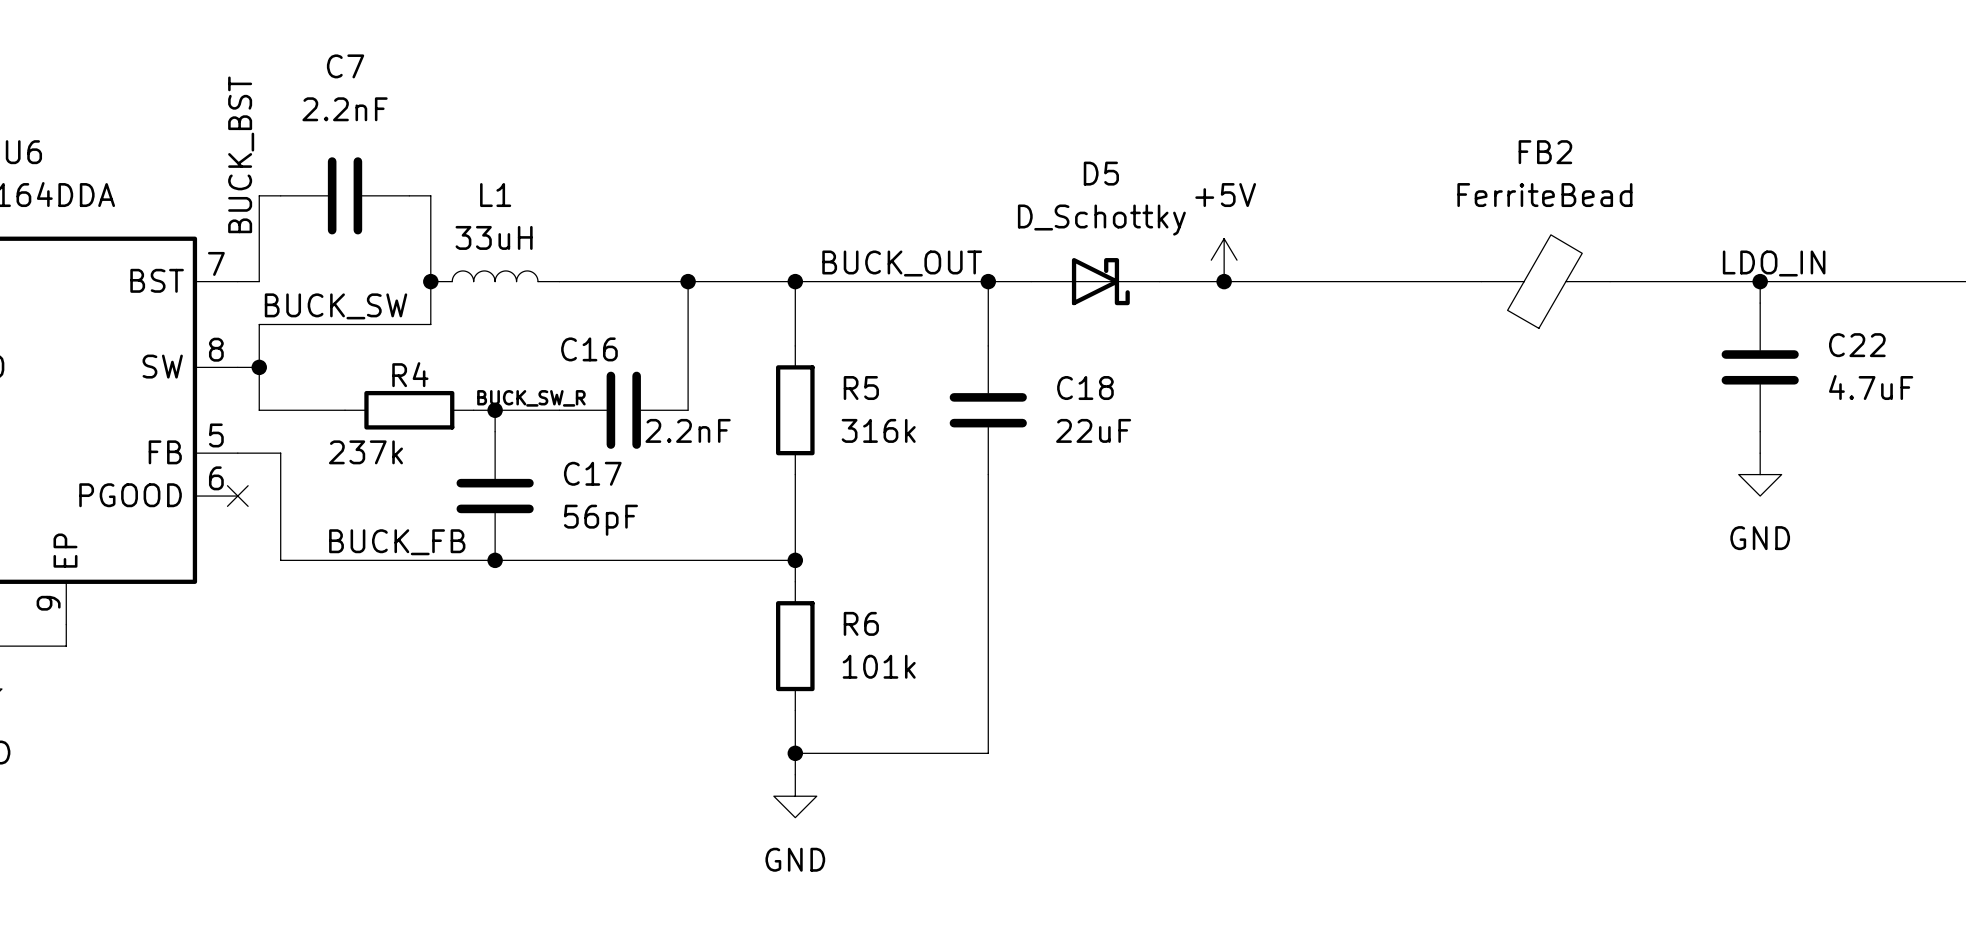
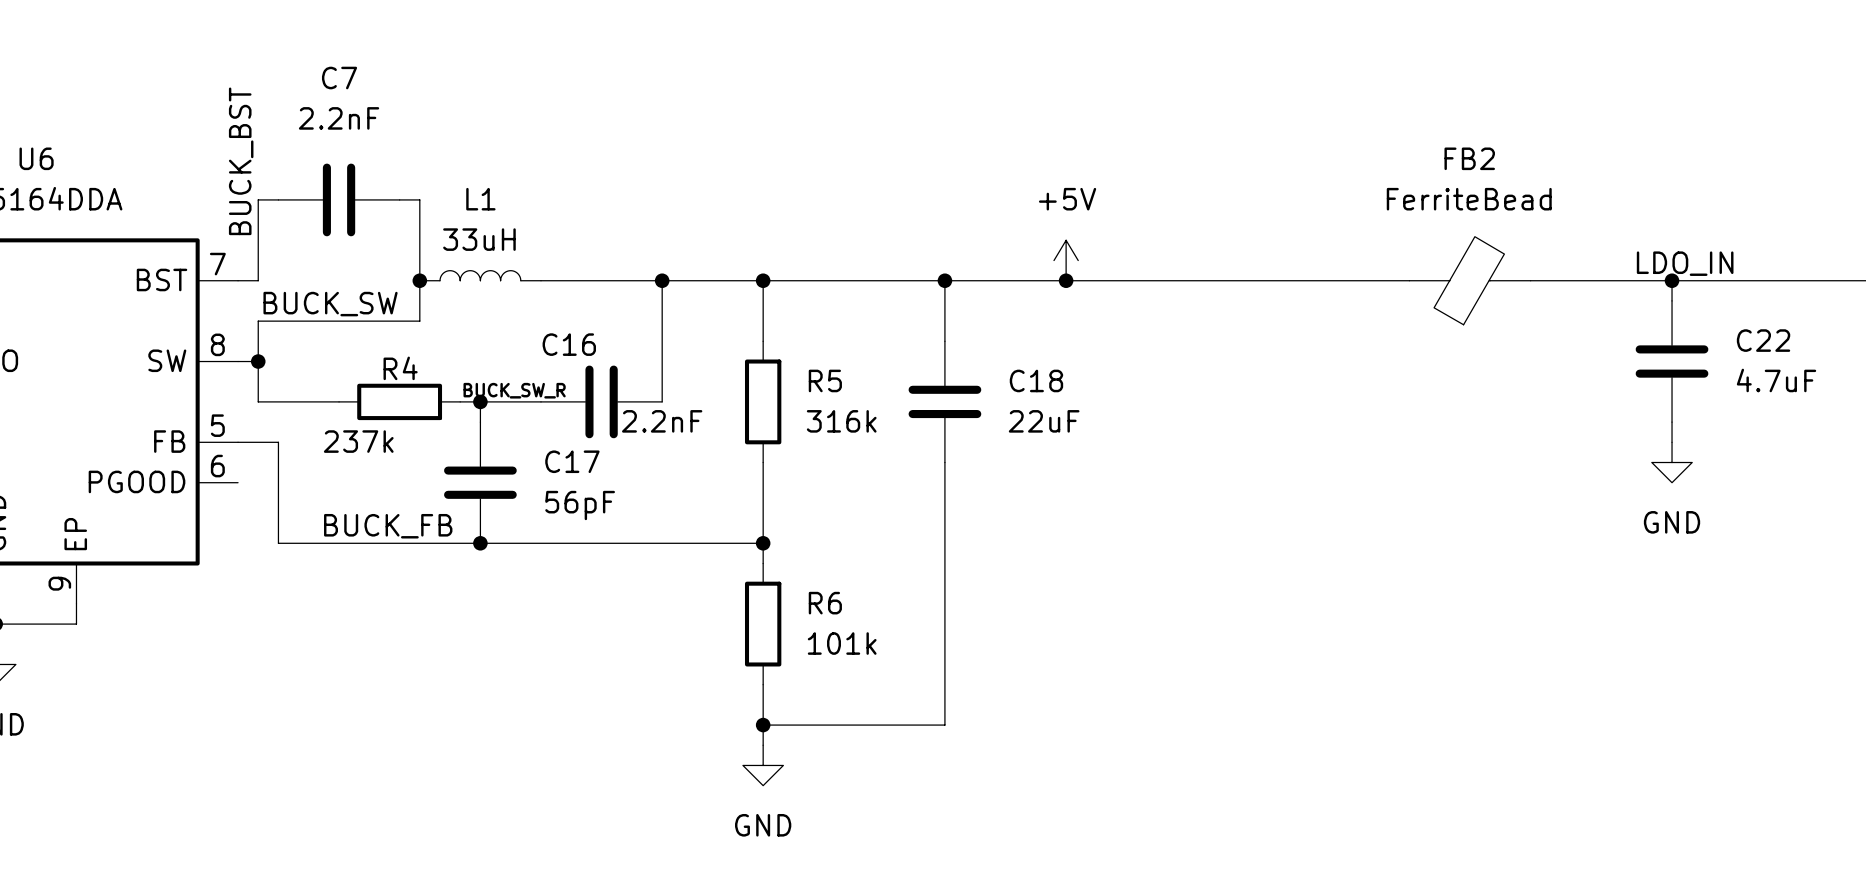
power symbol position: +5V (1224, 260) -> +5V (1066, 260)
label: BUCK_OUT (902, 263) -> none
D5: D_Schottky (1095, 281) -> none
junction: none -> (1066, 280)
junction: (1224, 281) -> none
no-connect mark: (237, 496) -> none

